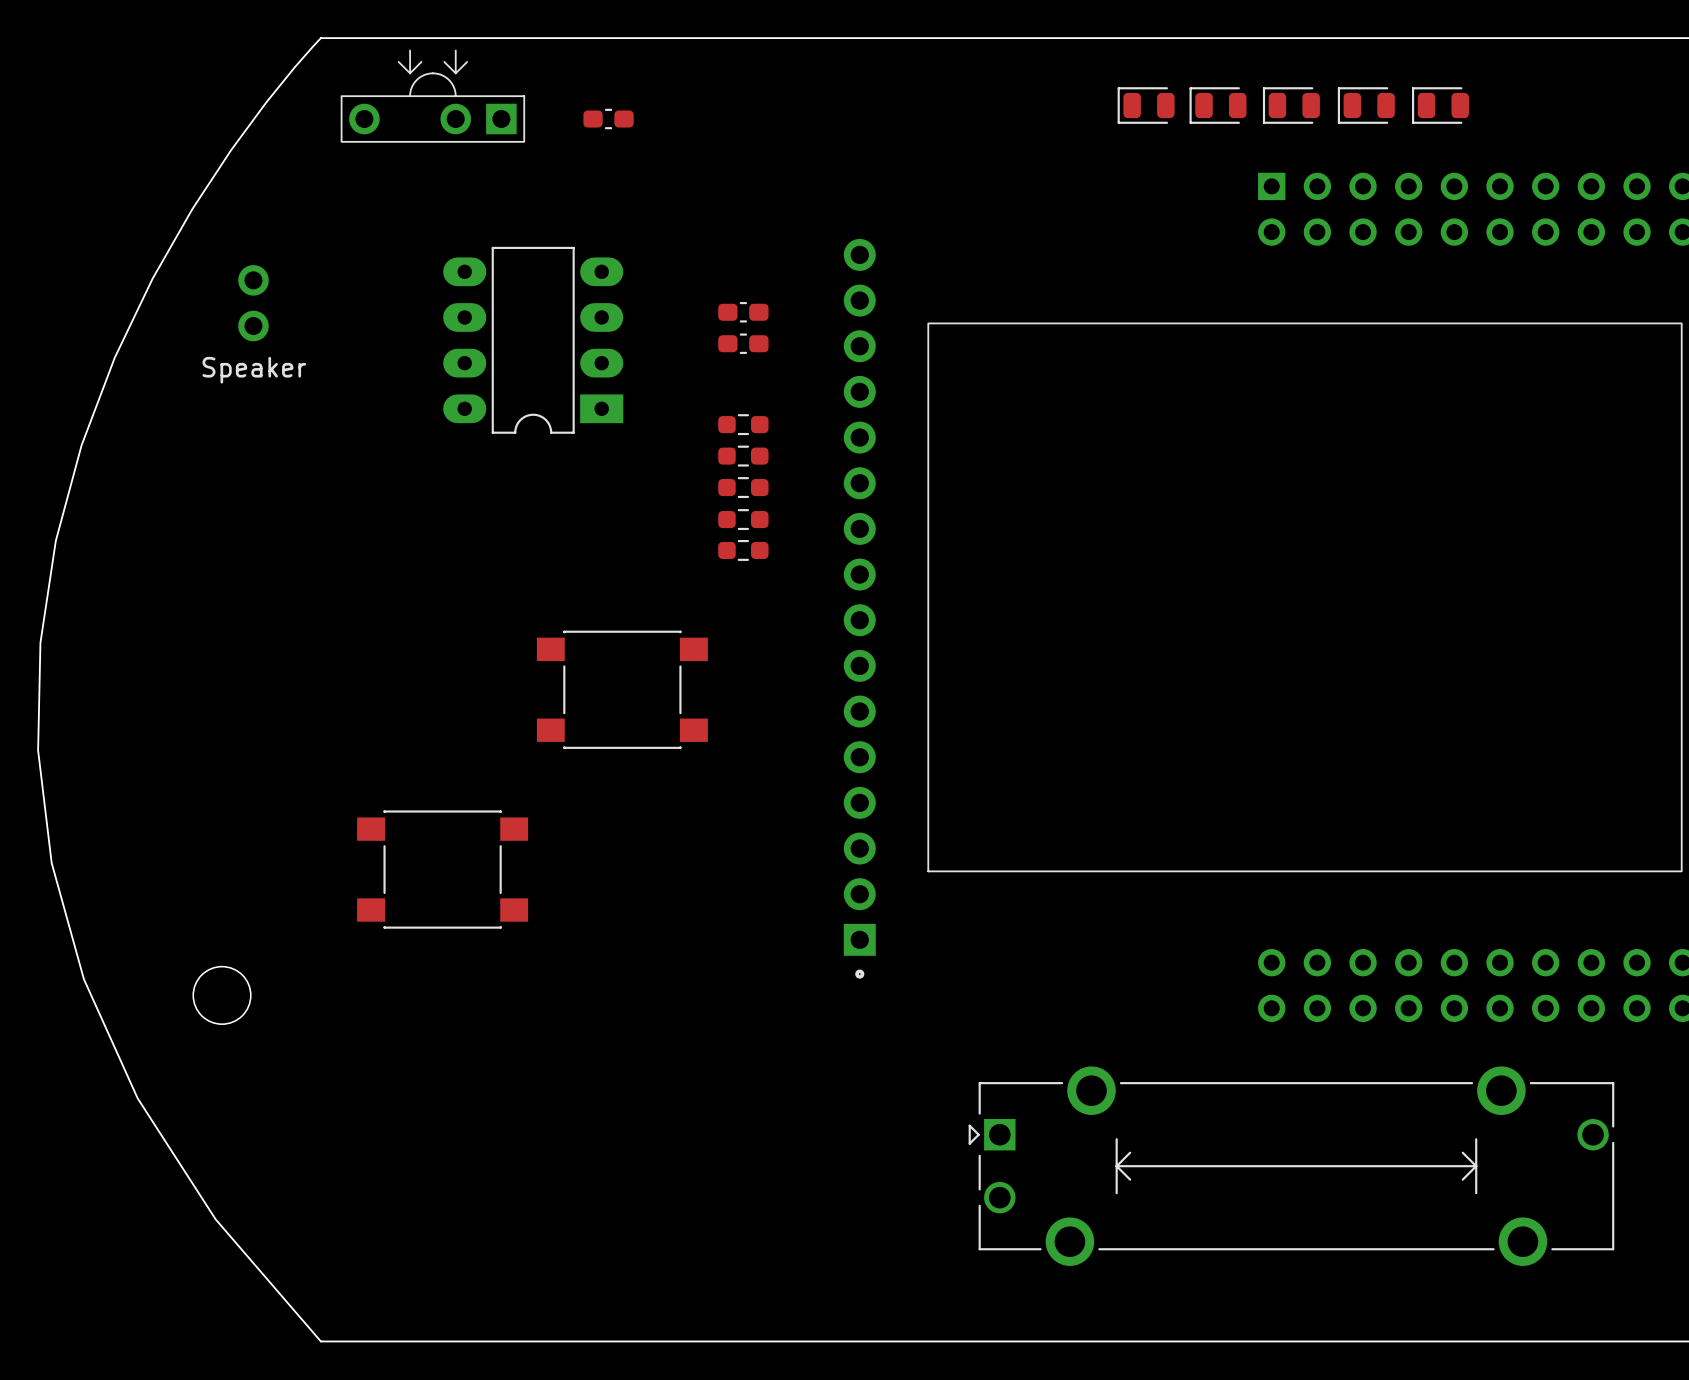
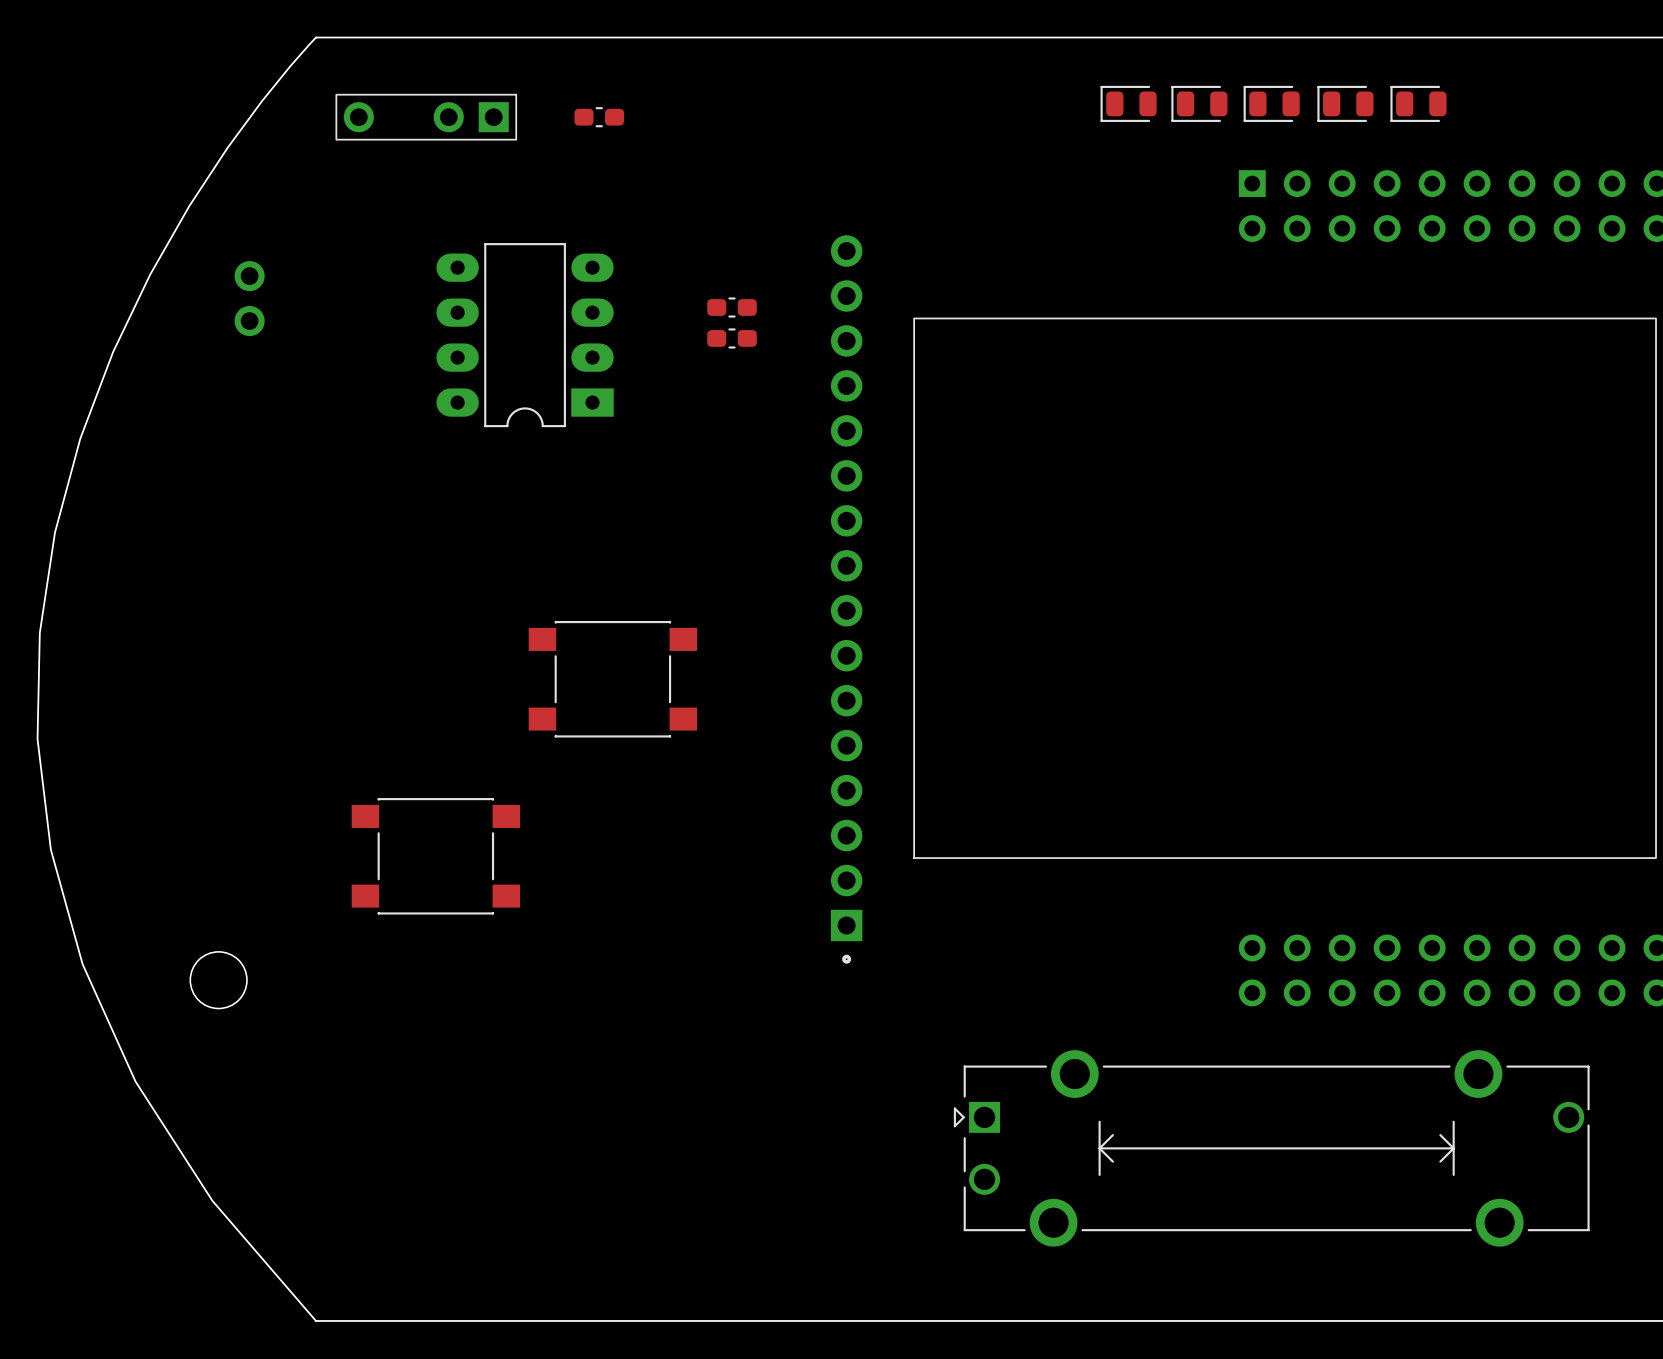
part: (432, 96) -> none
part: none -> (426, 117)
part value: Speaker (254, 370) -> none
part: (743, 424) -> none
part: (743, 456) -> none
part: (743, 487) -> none
part: (743, 519) -> none
part: (743, 550) -> none

